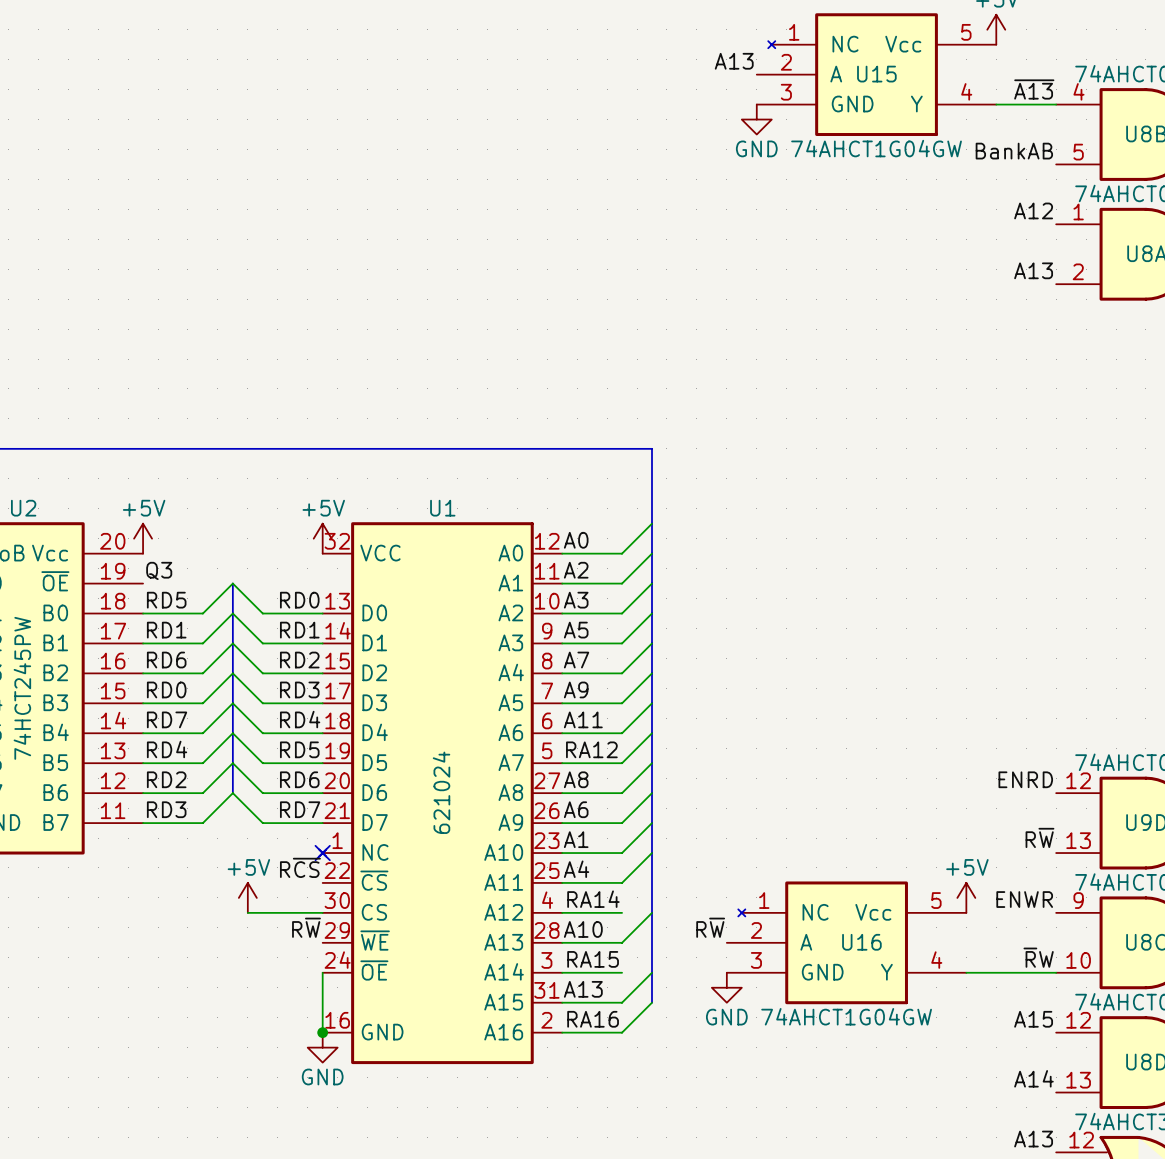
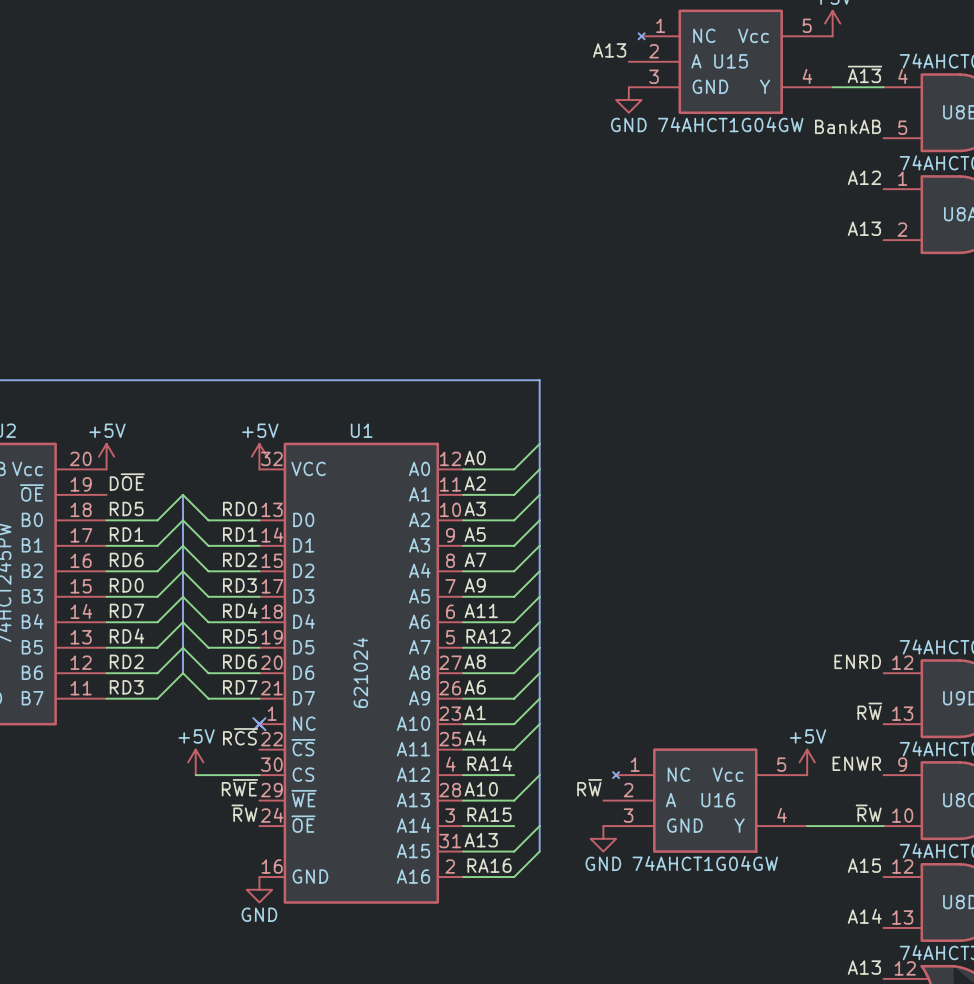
label: Q3 (159, 570) -> D~{OE} (127, 482)
label: R~{W} (306, 927) -> R~{WE} (239, 787)
label: none -> ~{R}W (244, 813)
wire: (322, 972) (322, 1032) -> none
junction: (322, 1032) -> none

